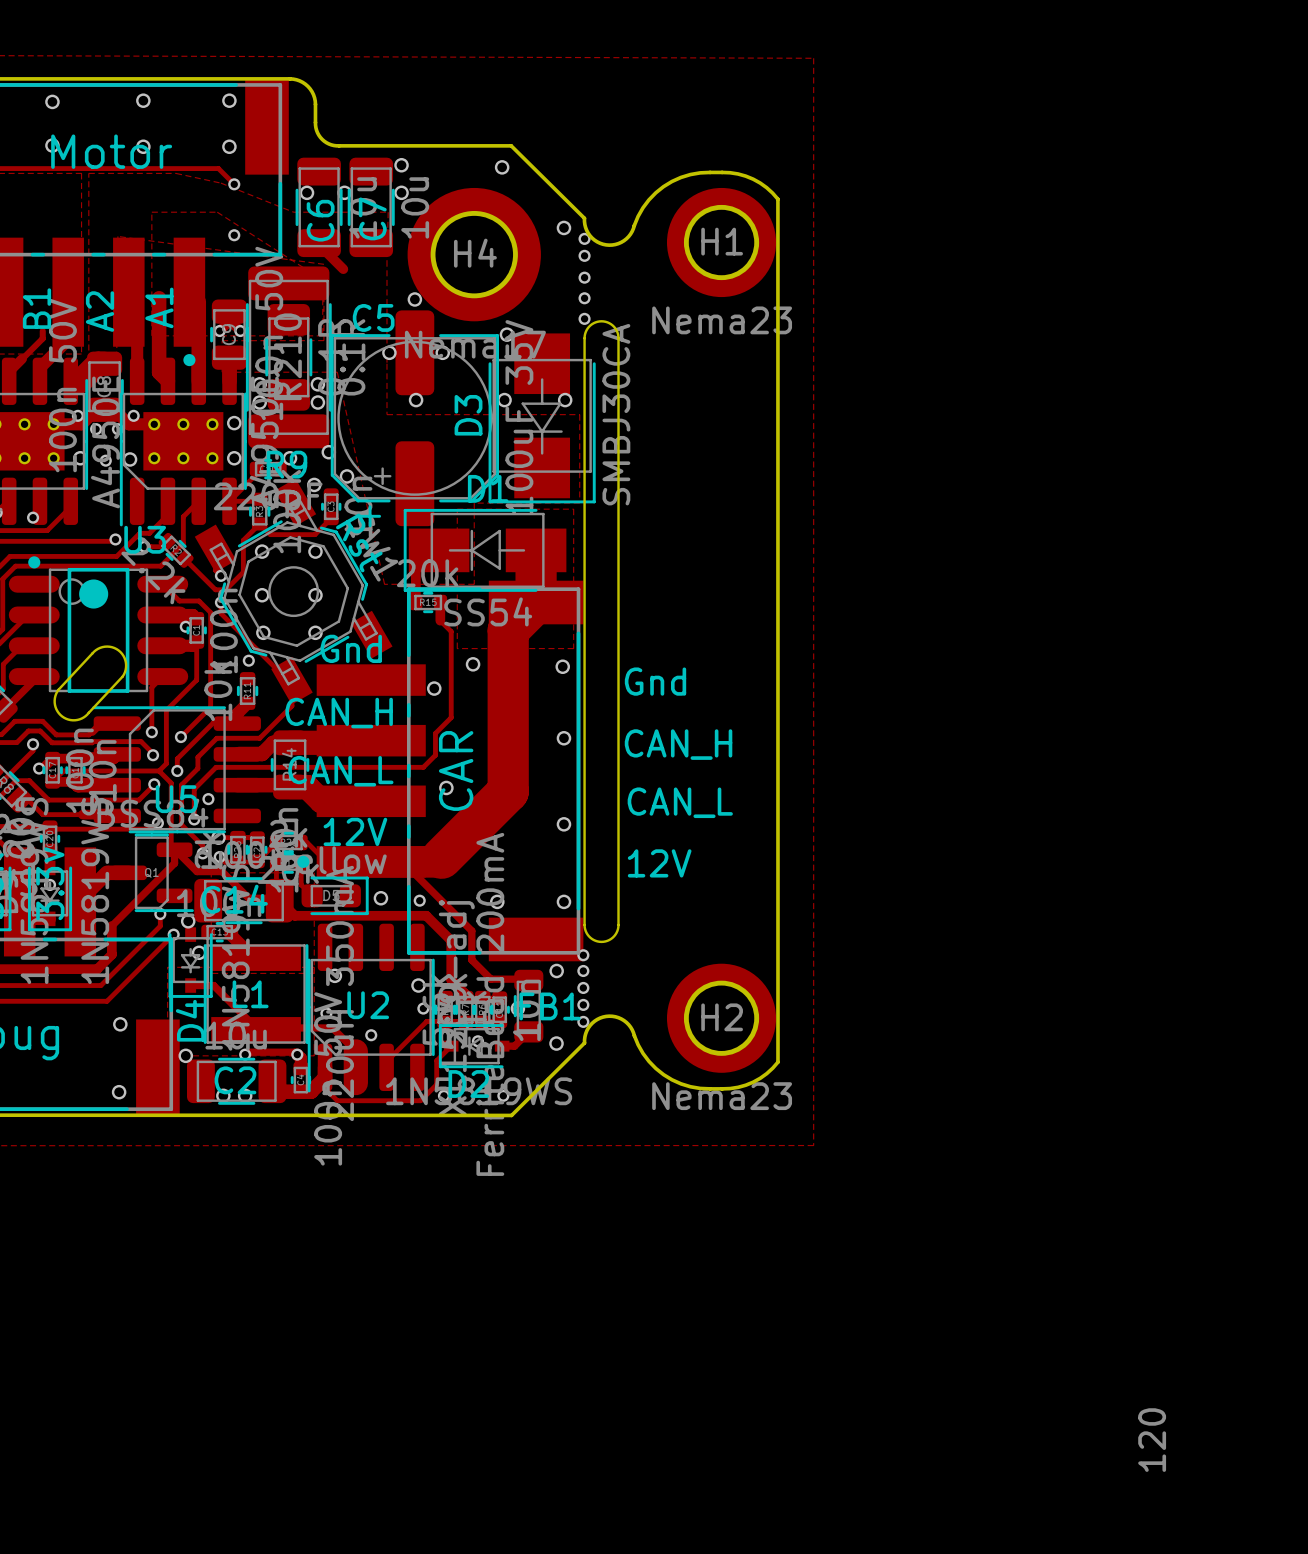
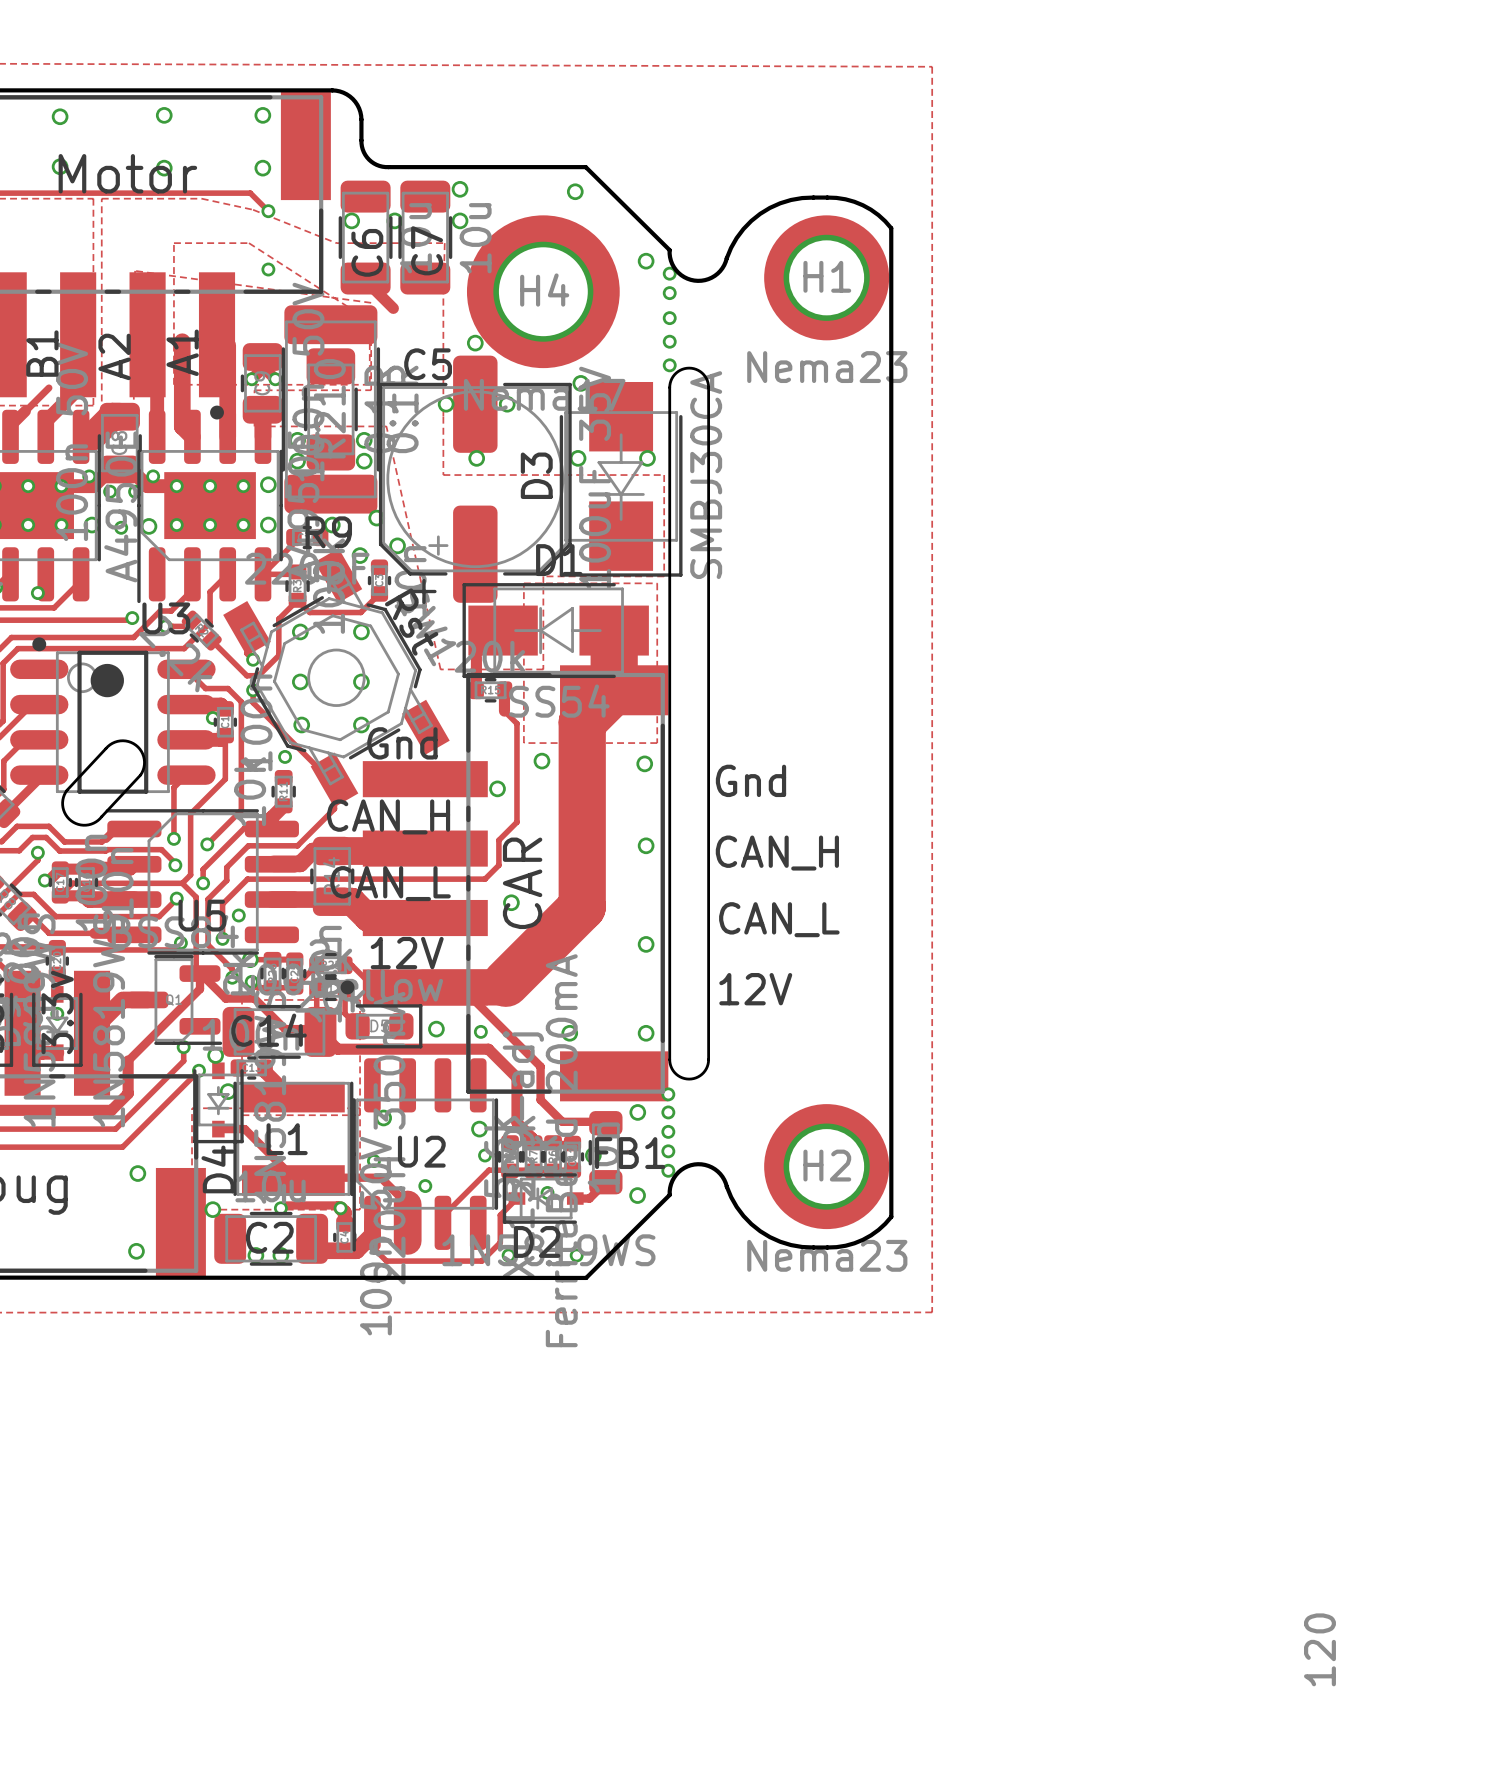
track: (42, 330) (42, 338) -> none

